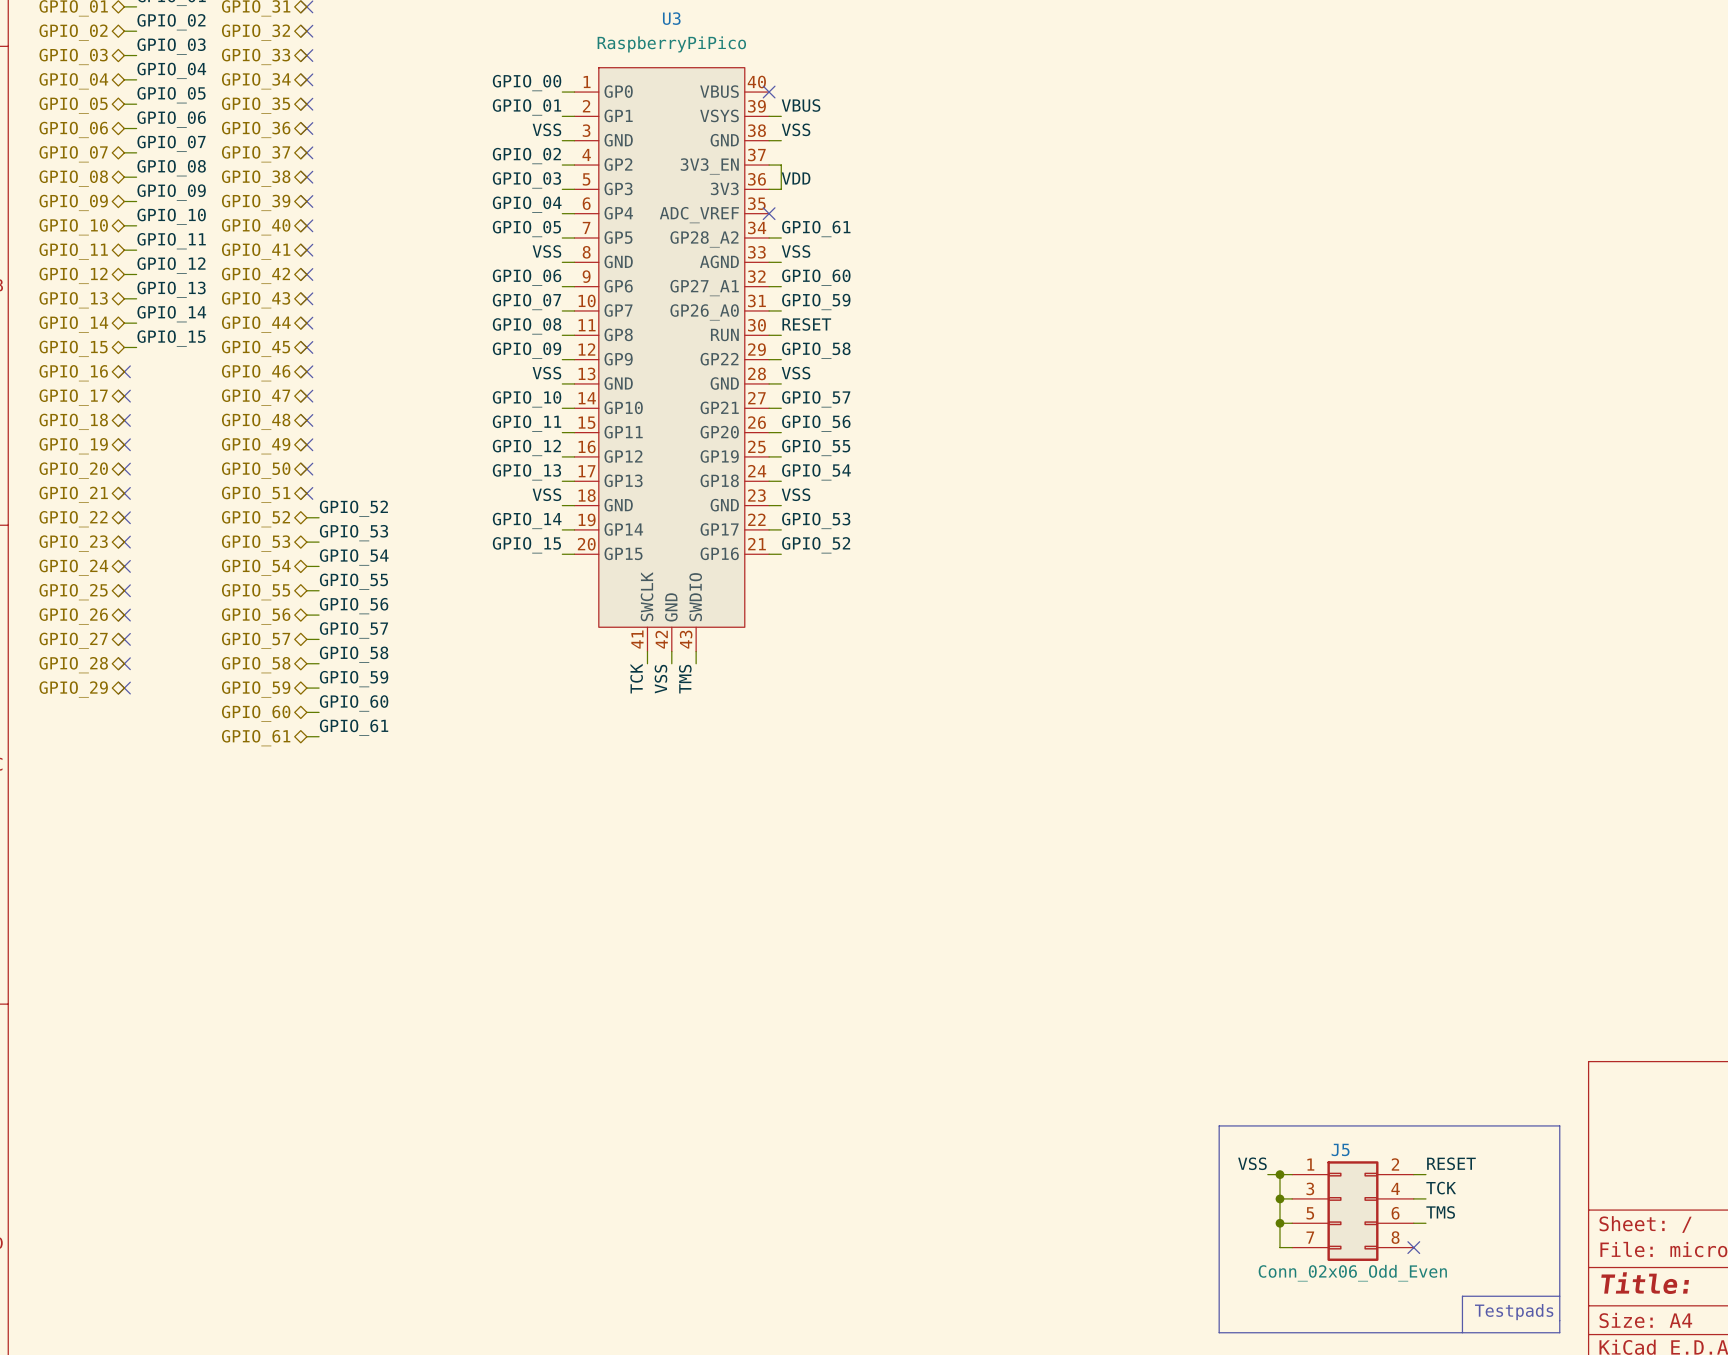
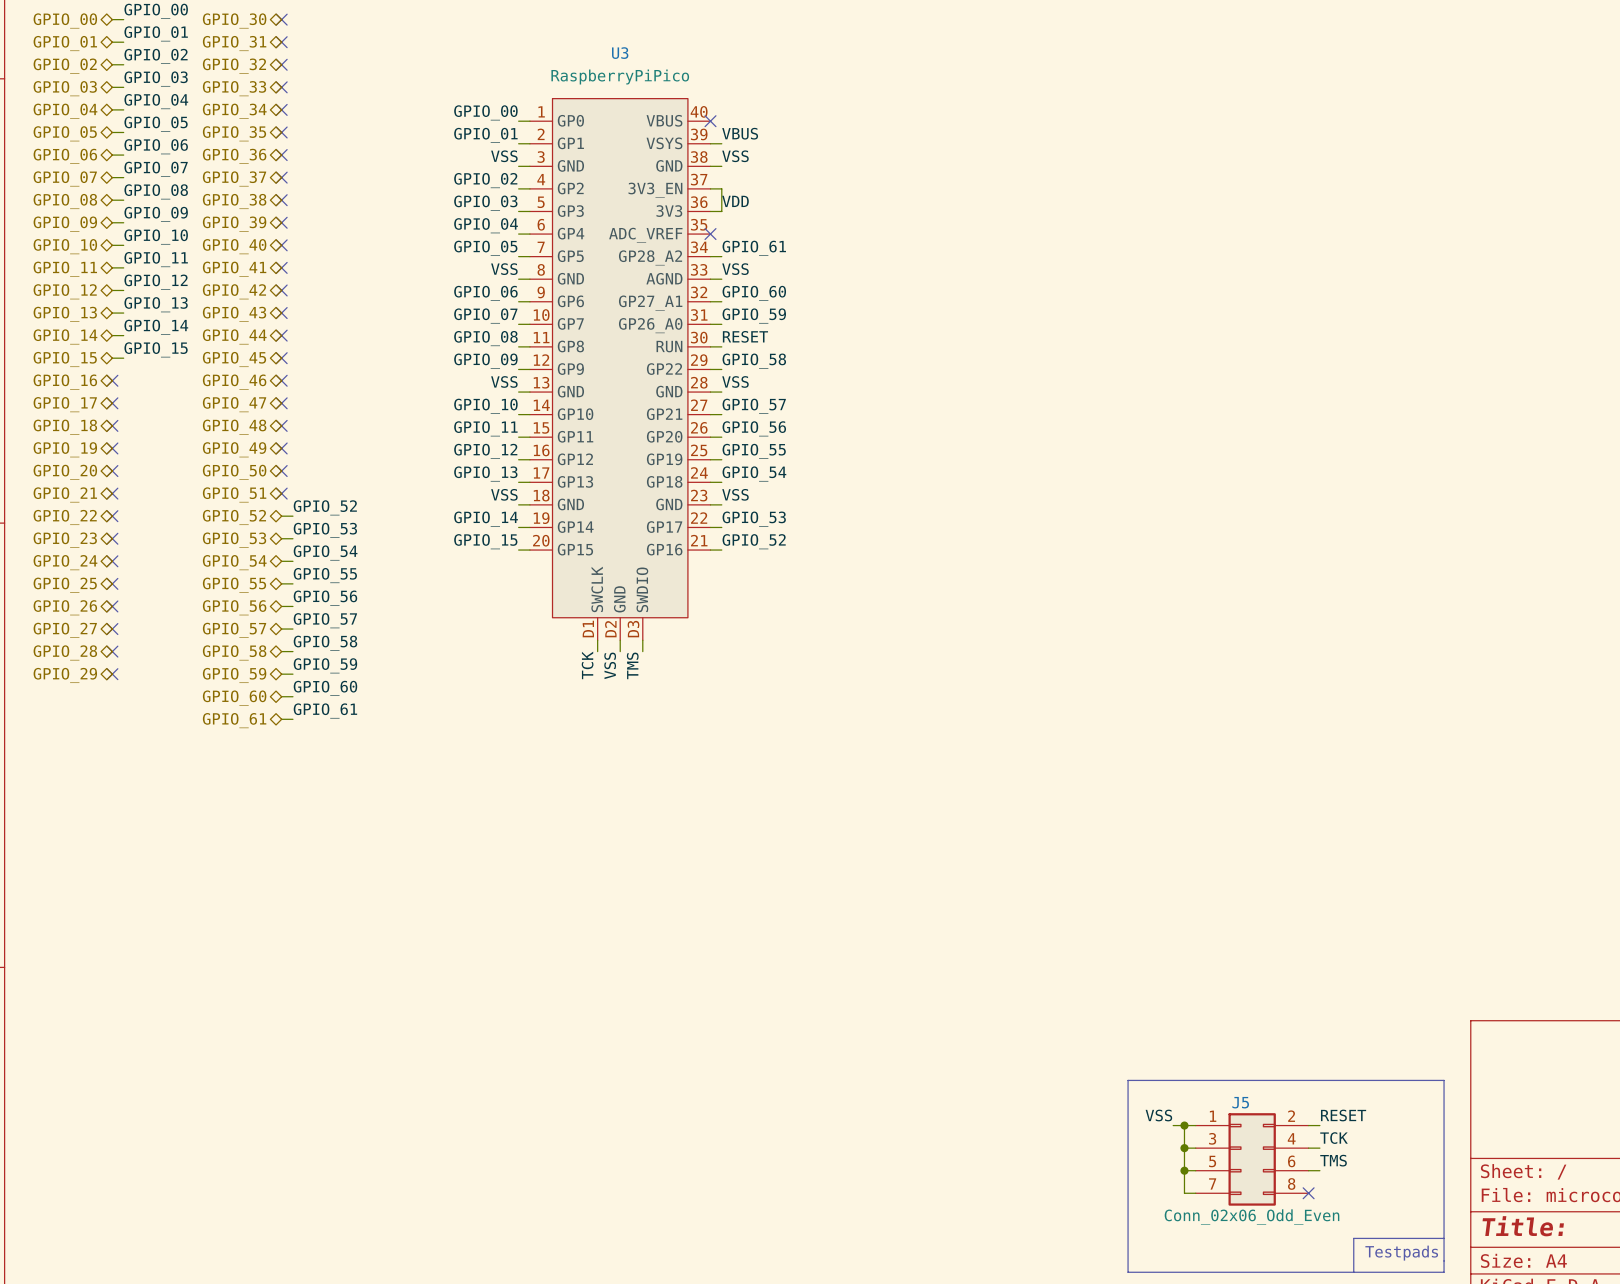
U3 pin number: 41 (637, 639) -> D1 (588, 629)
U3 pin number: 42 (661, 639) -> D2 (610, 629)
U3 pin number: 43 (686, 639) -> D3 (633, 629)

